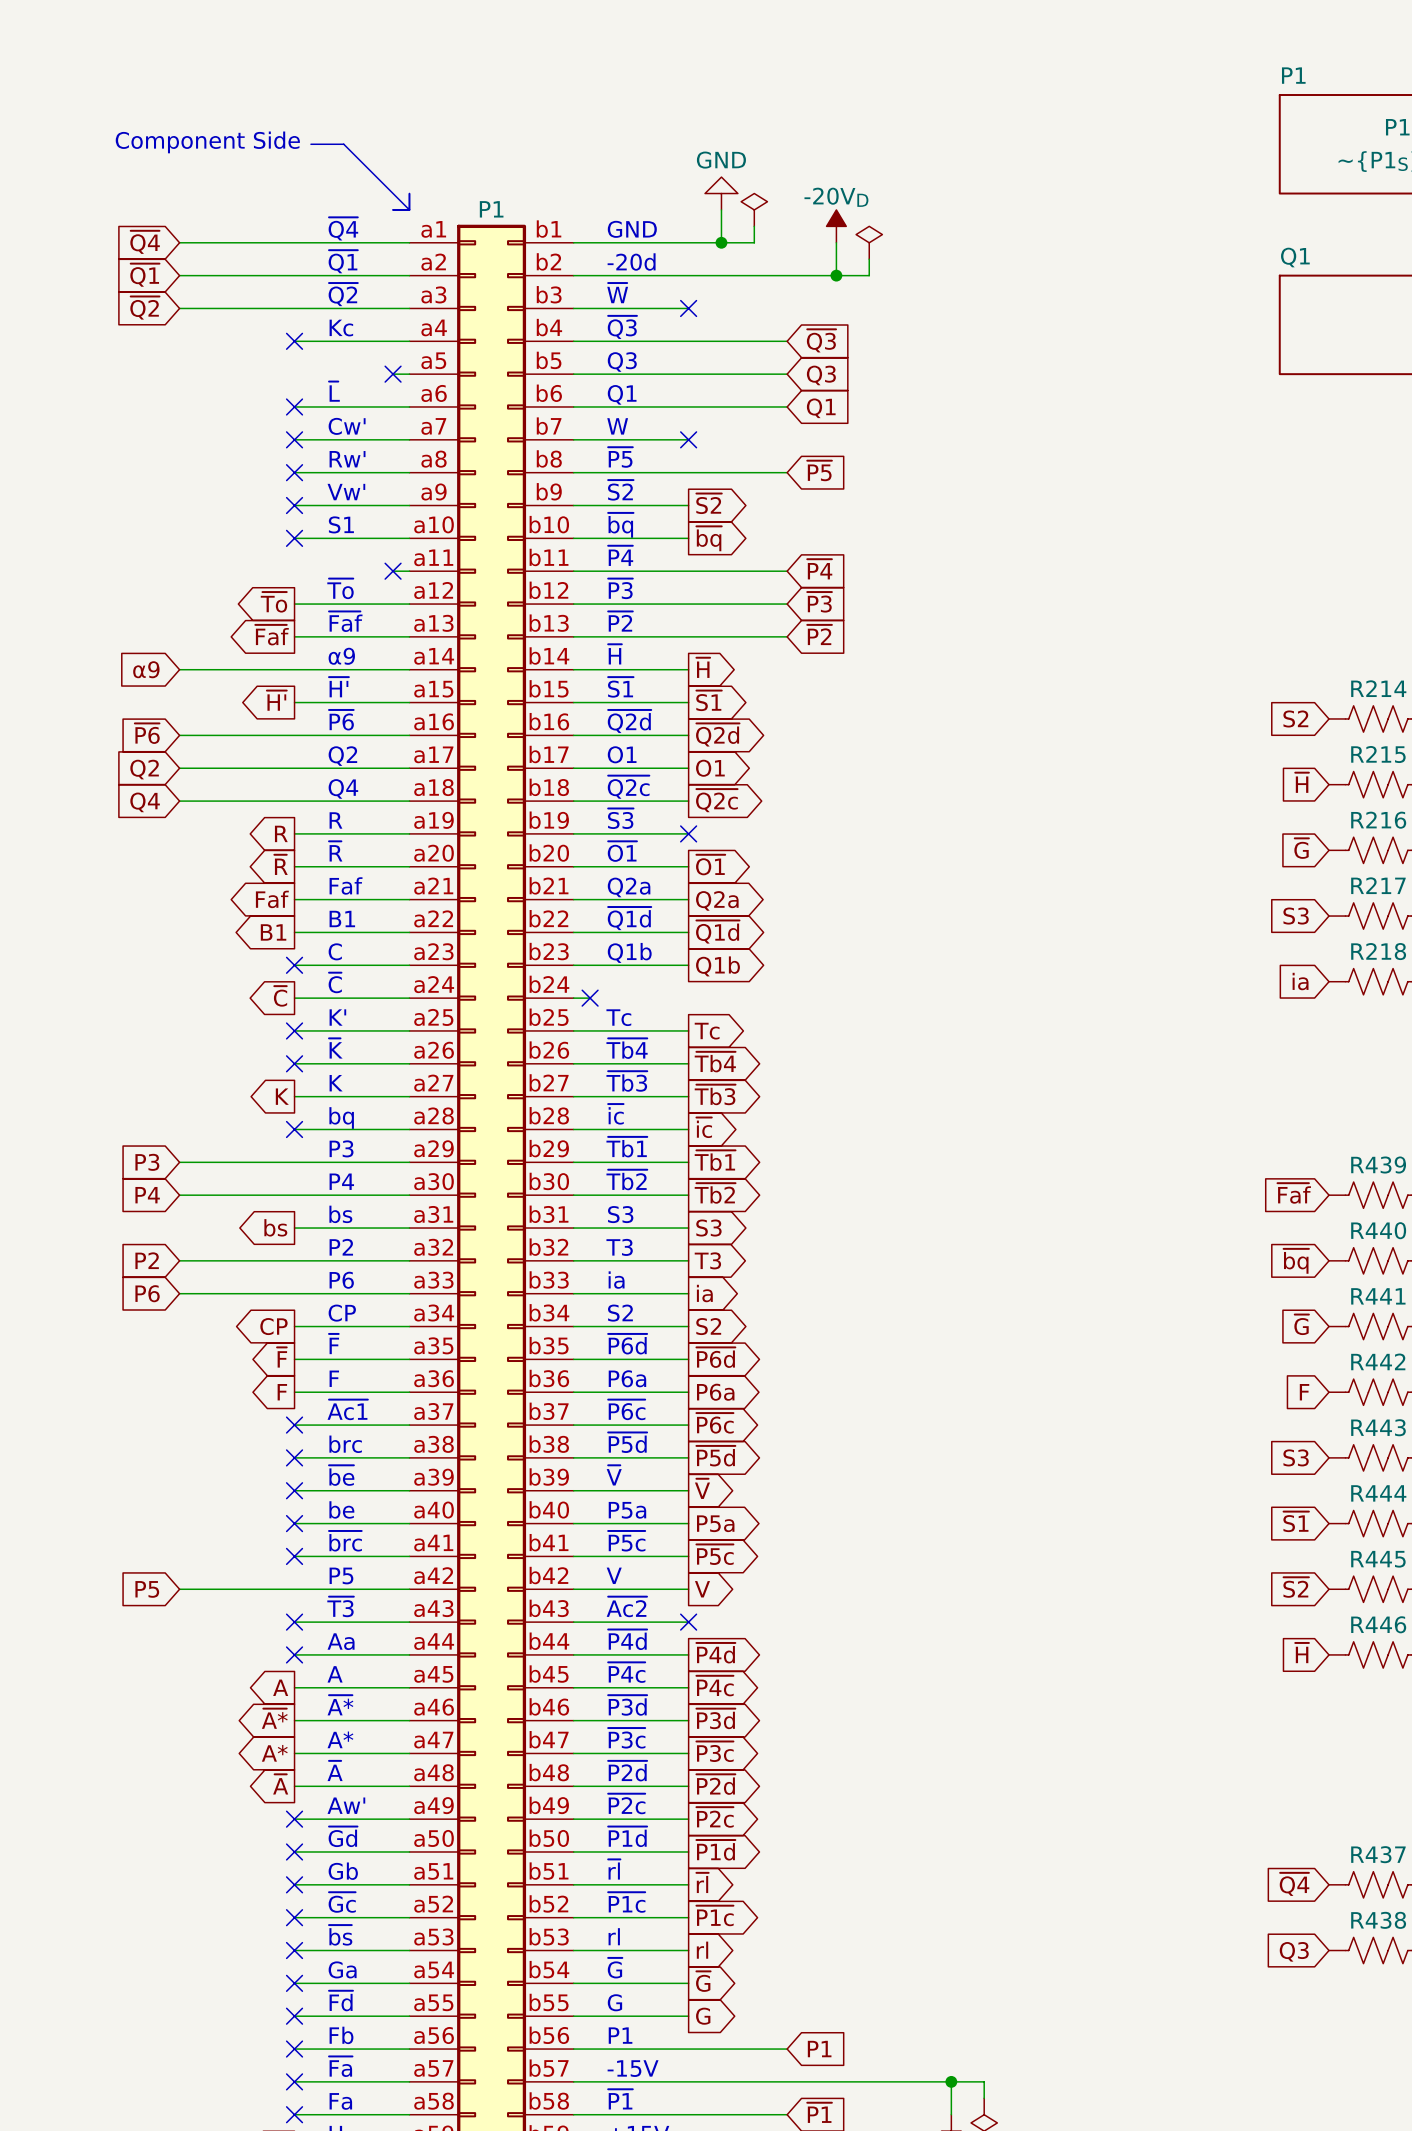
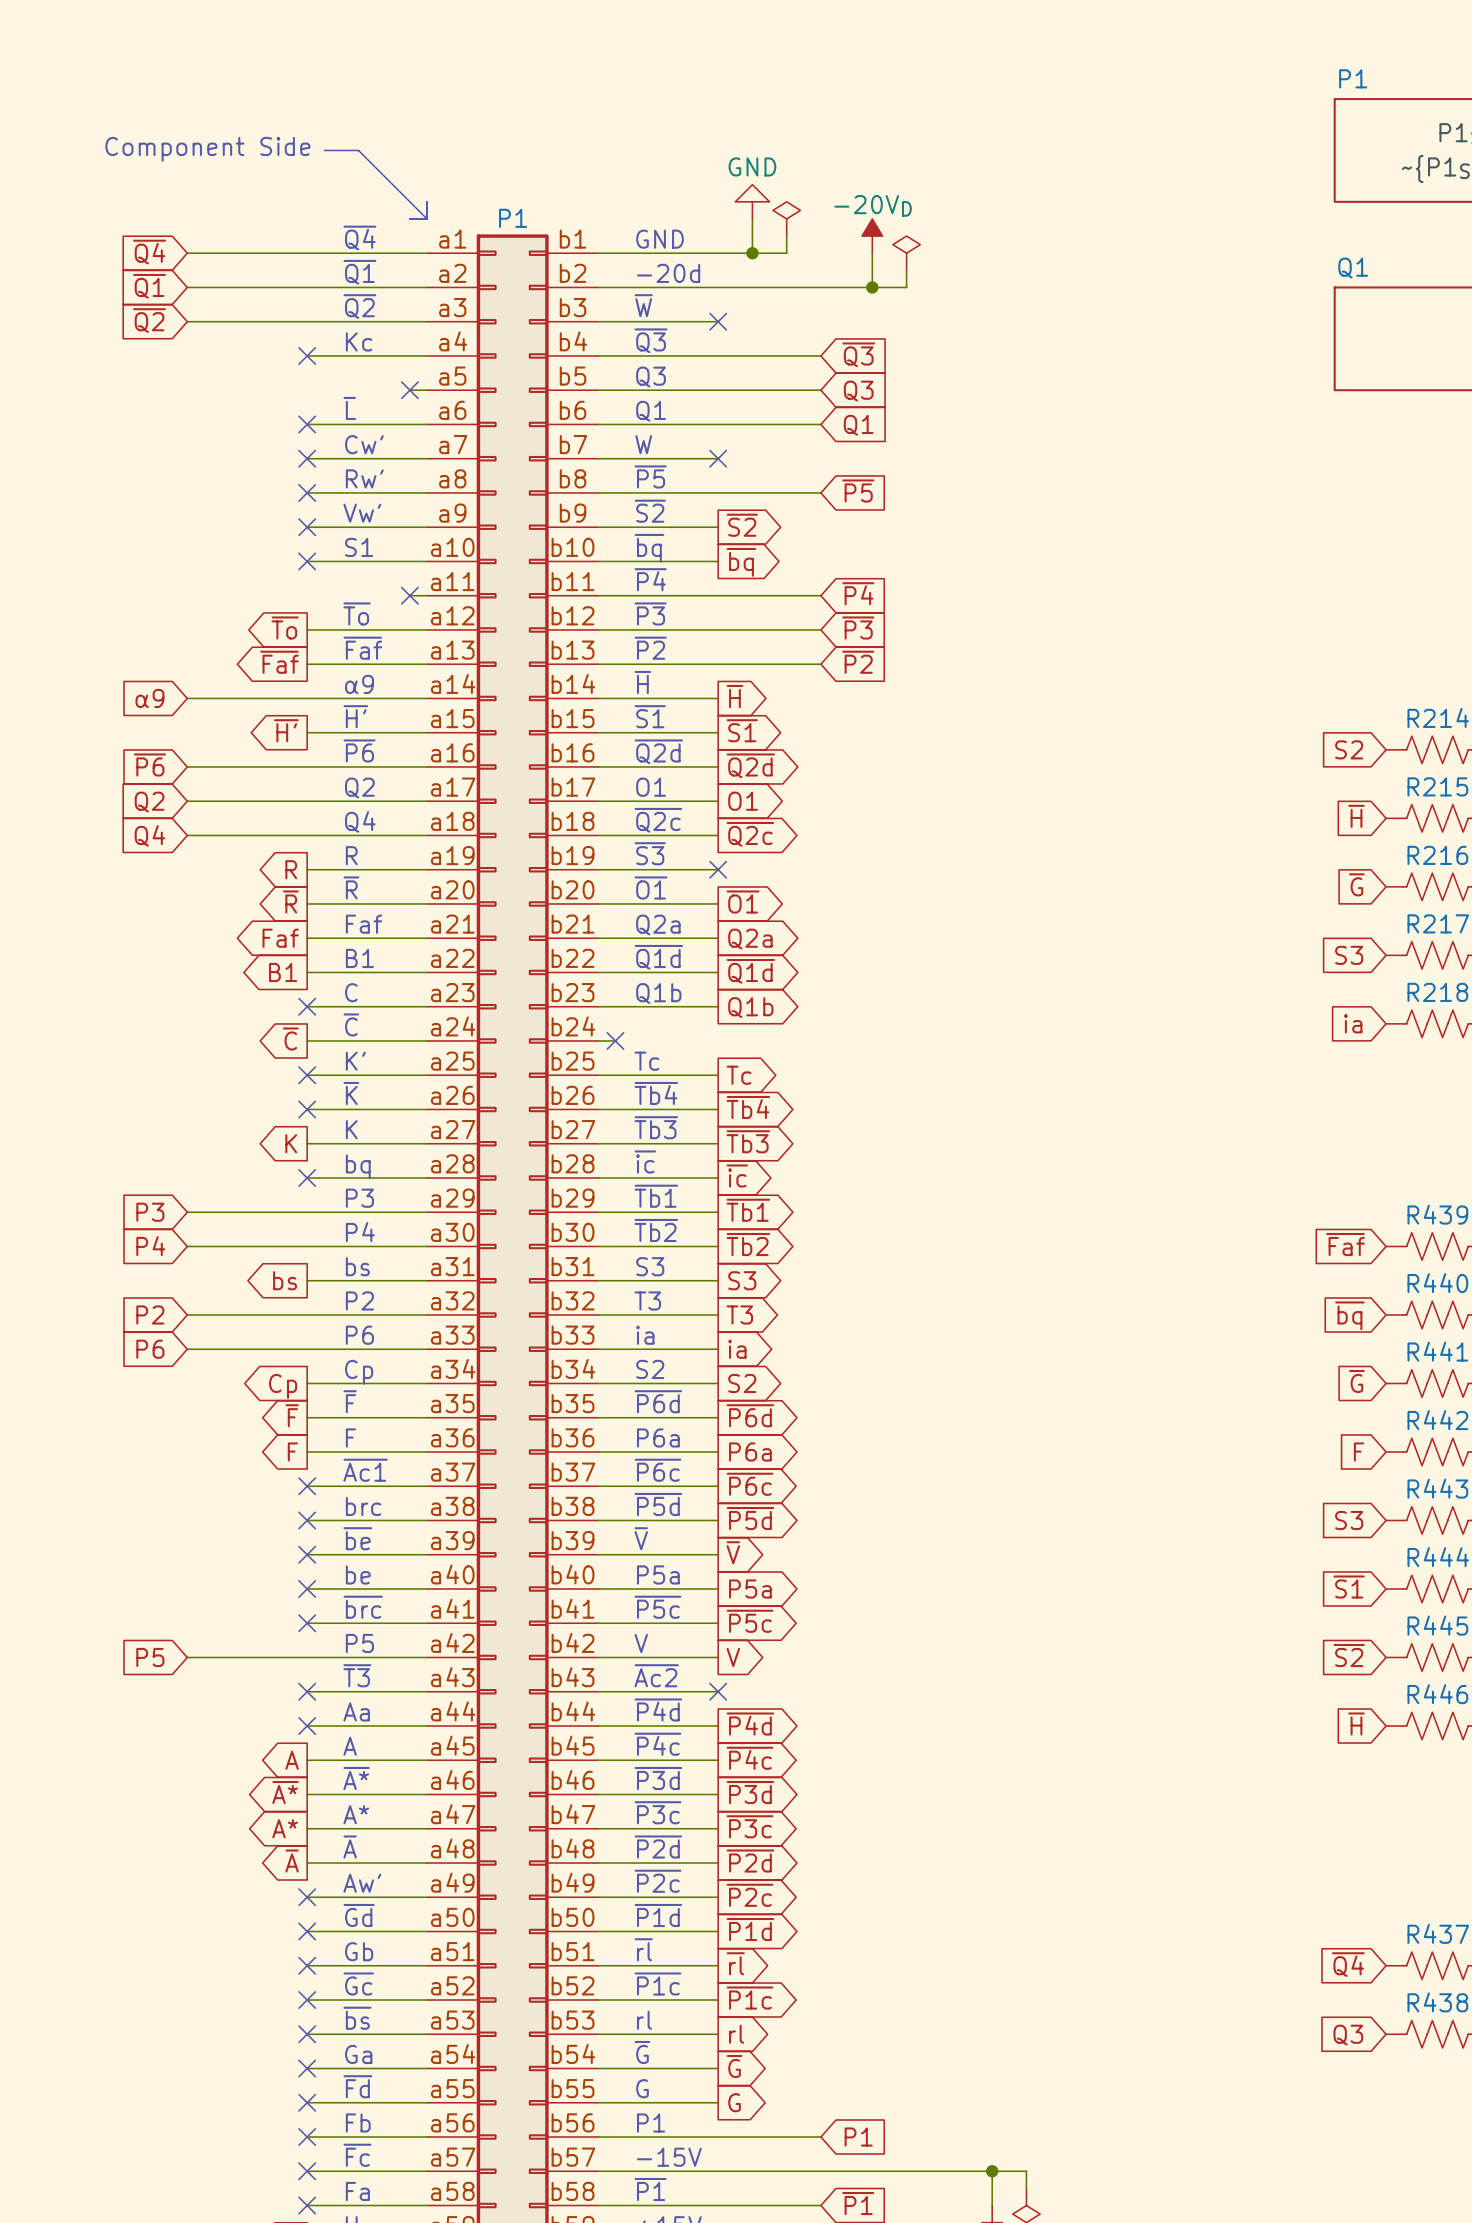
text: CP (342, 1313) -> Cp (359, 1372)
global label: CP (273, 1326) -> Cp (283, 1386)
text: ~{Fa} (340, 2066) -> ~{Fc} (357, 2155)

